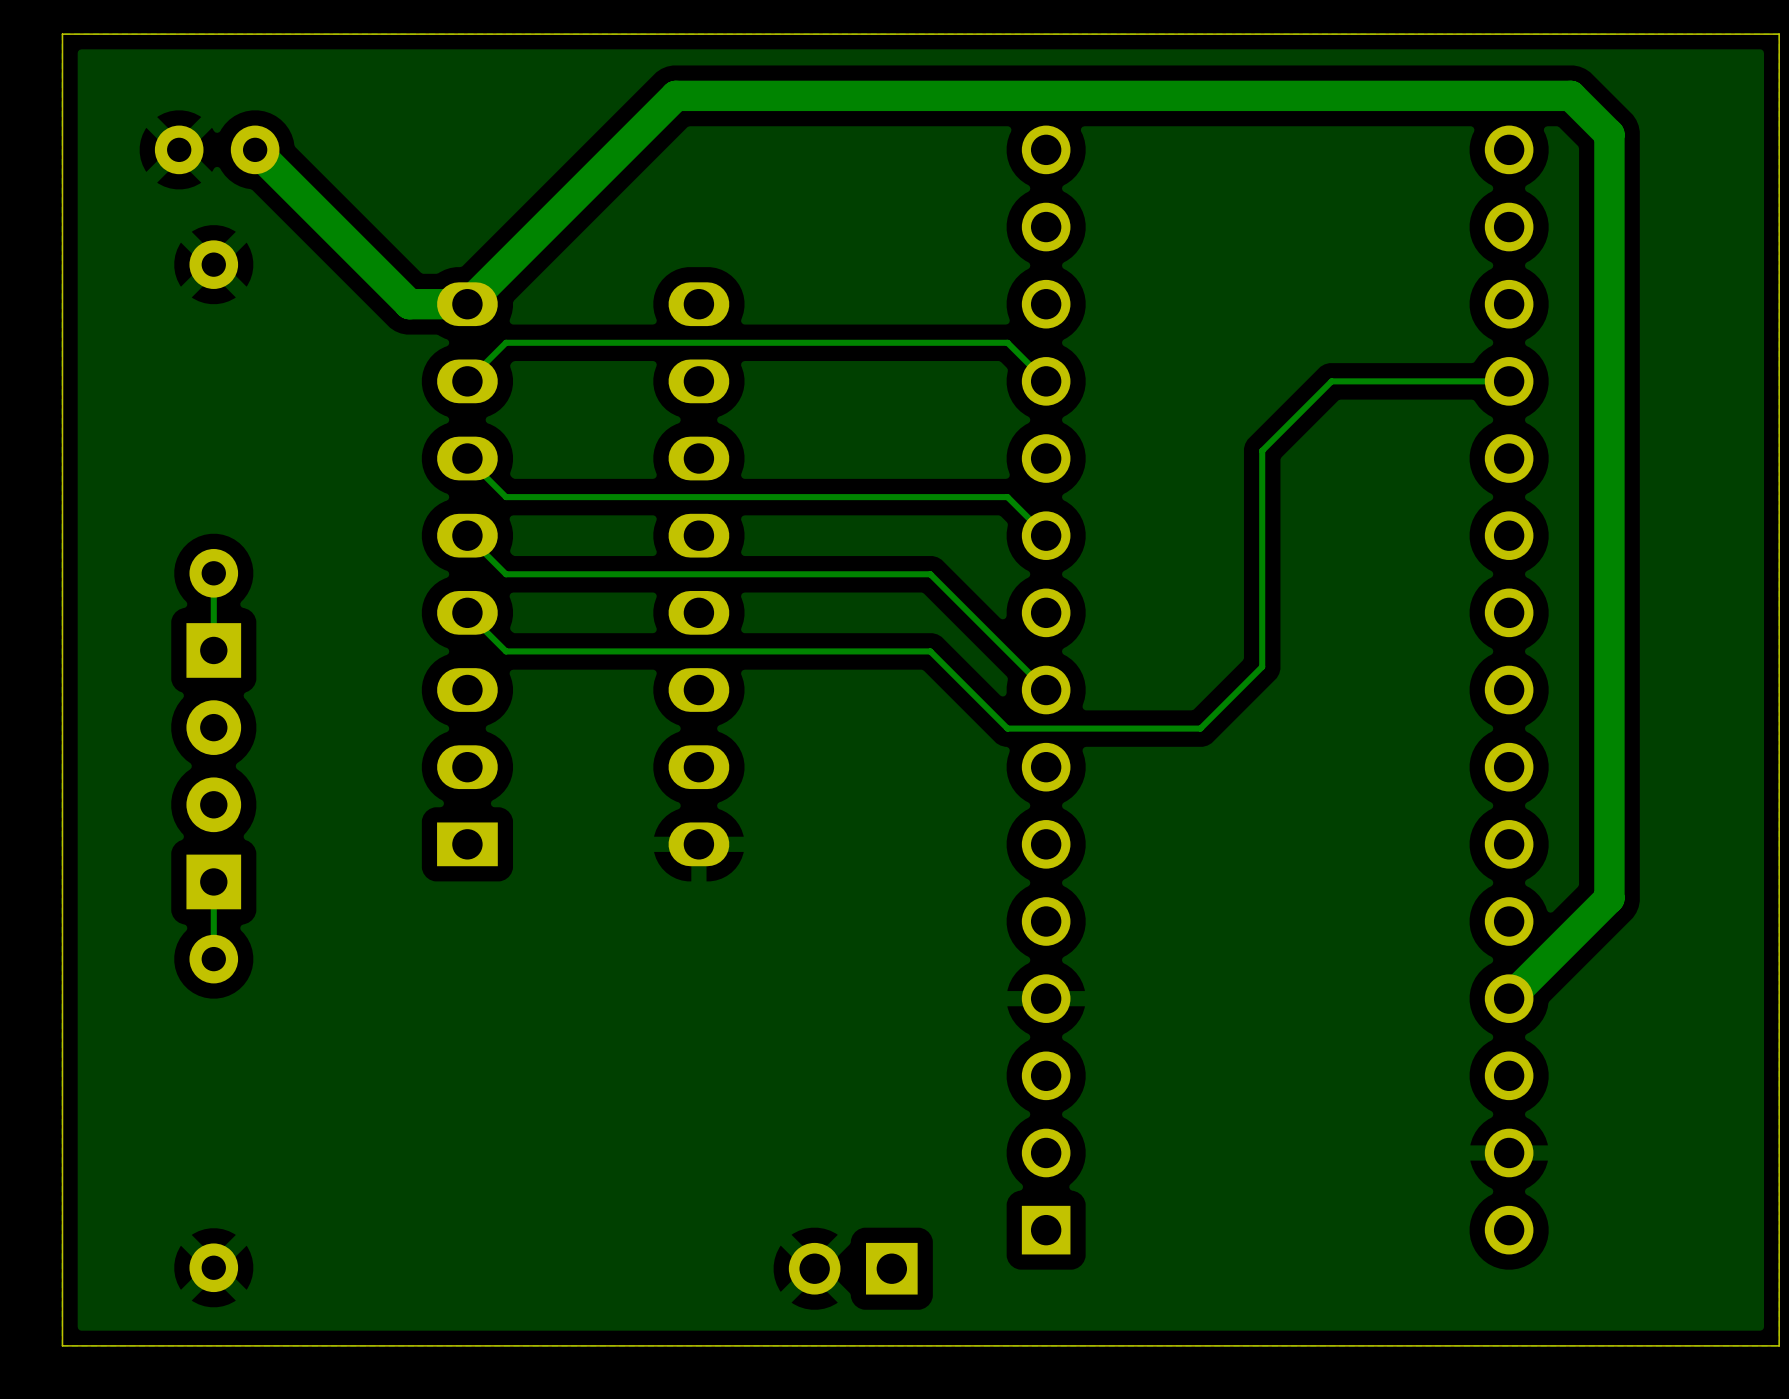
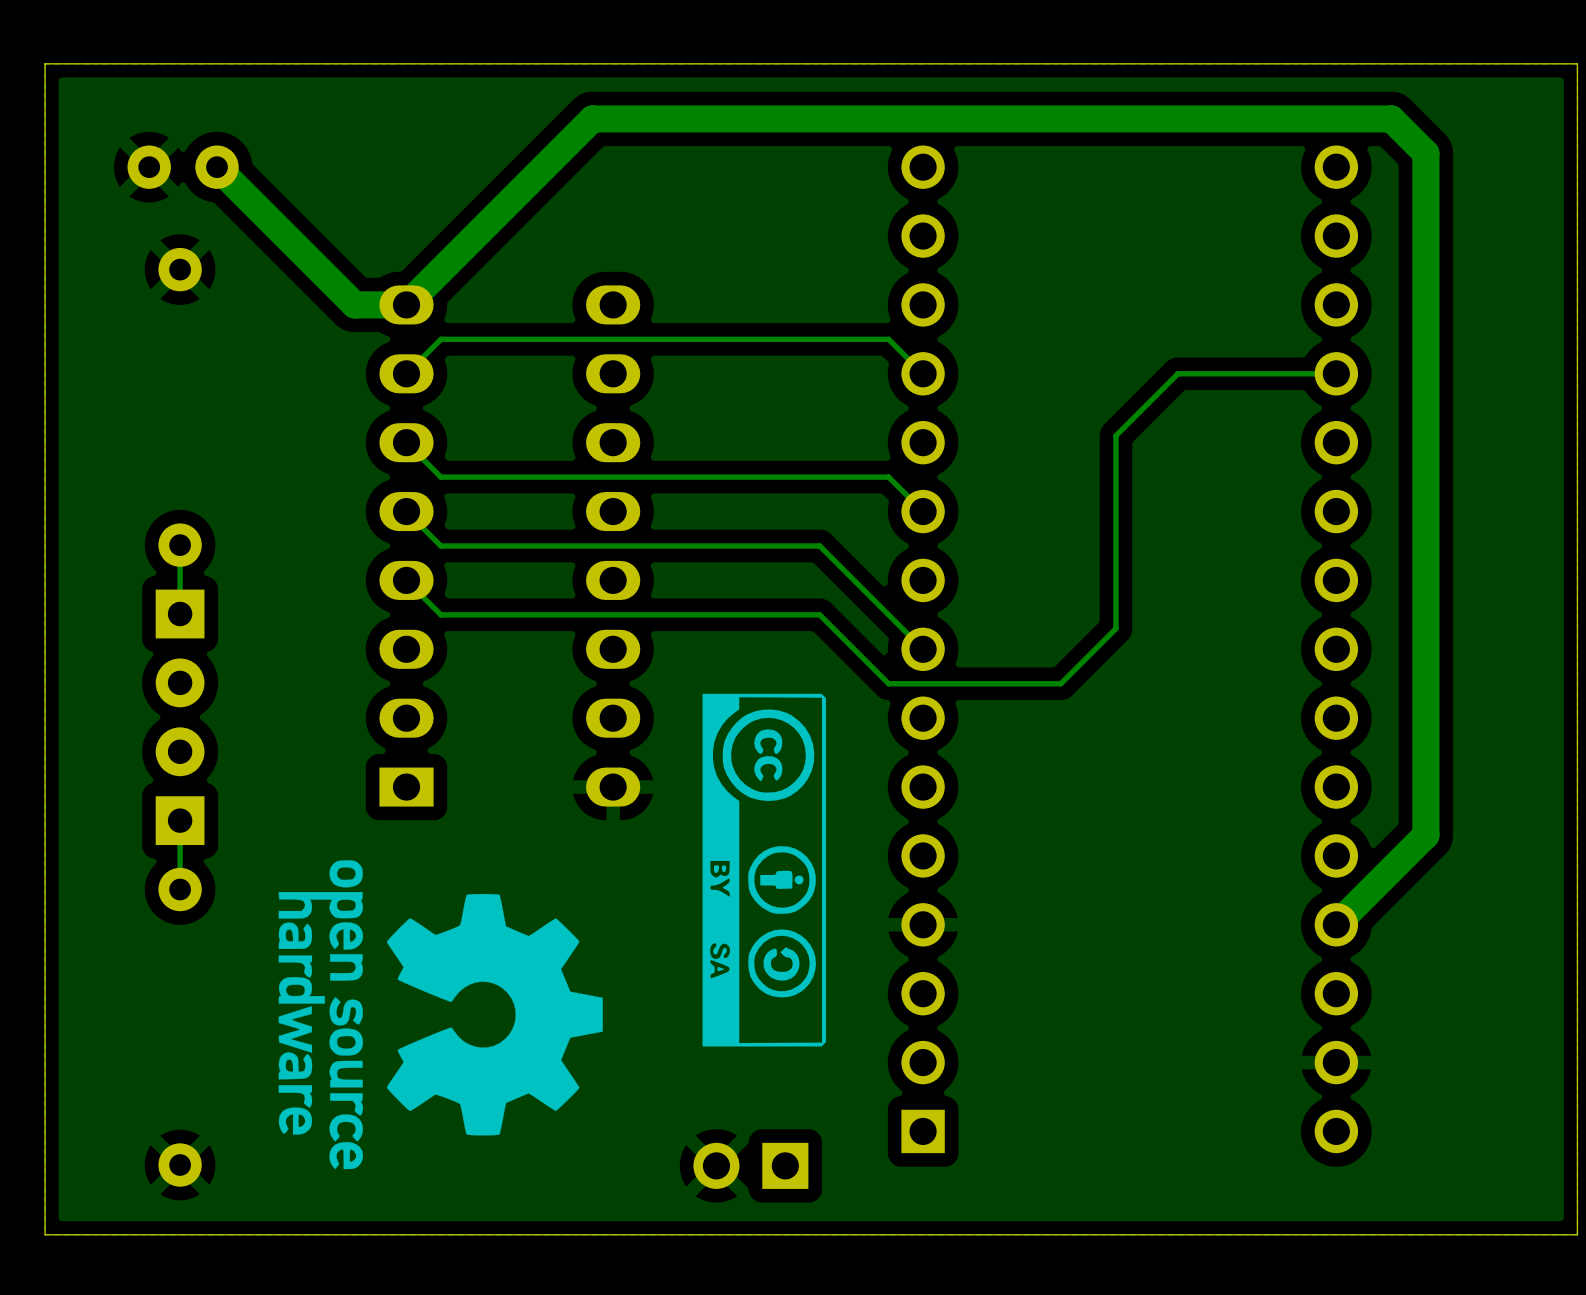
drawing: none -> [702, 693, 826, 1047]
drawing: none -> [278, 860, 603, 1170]

